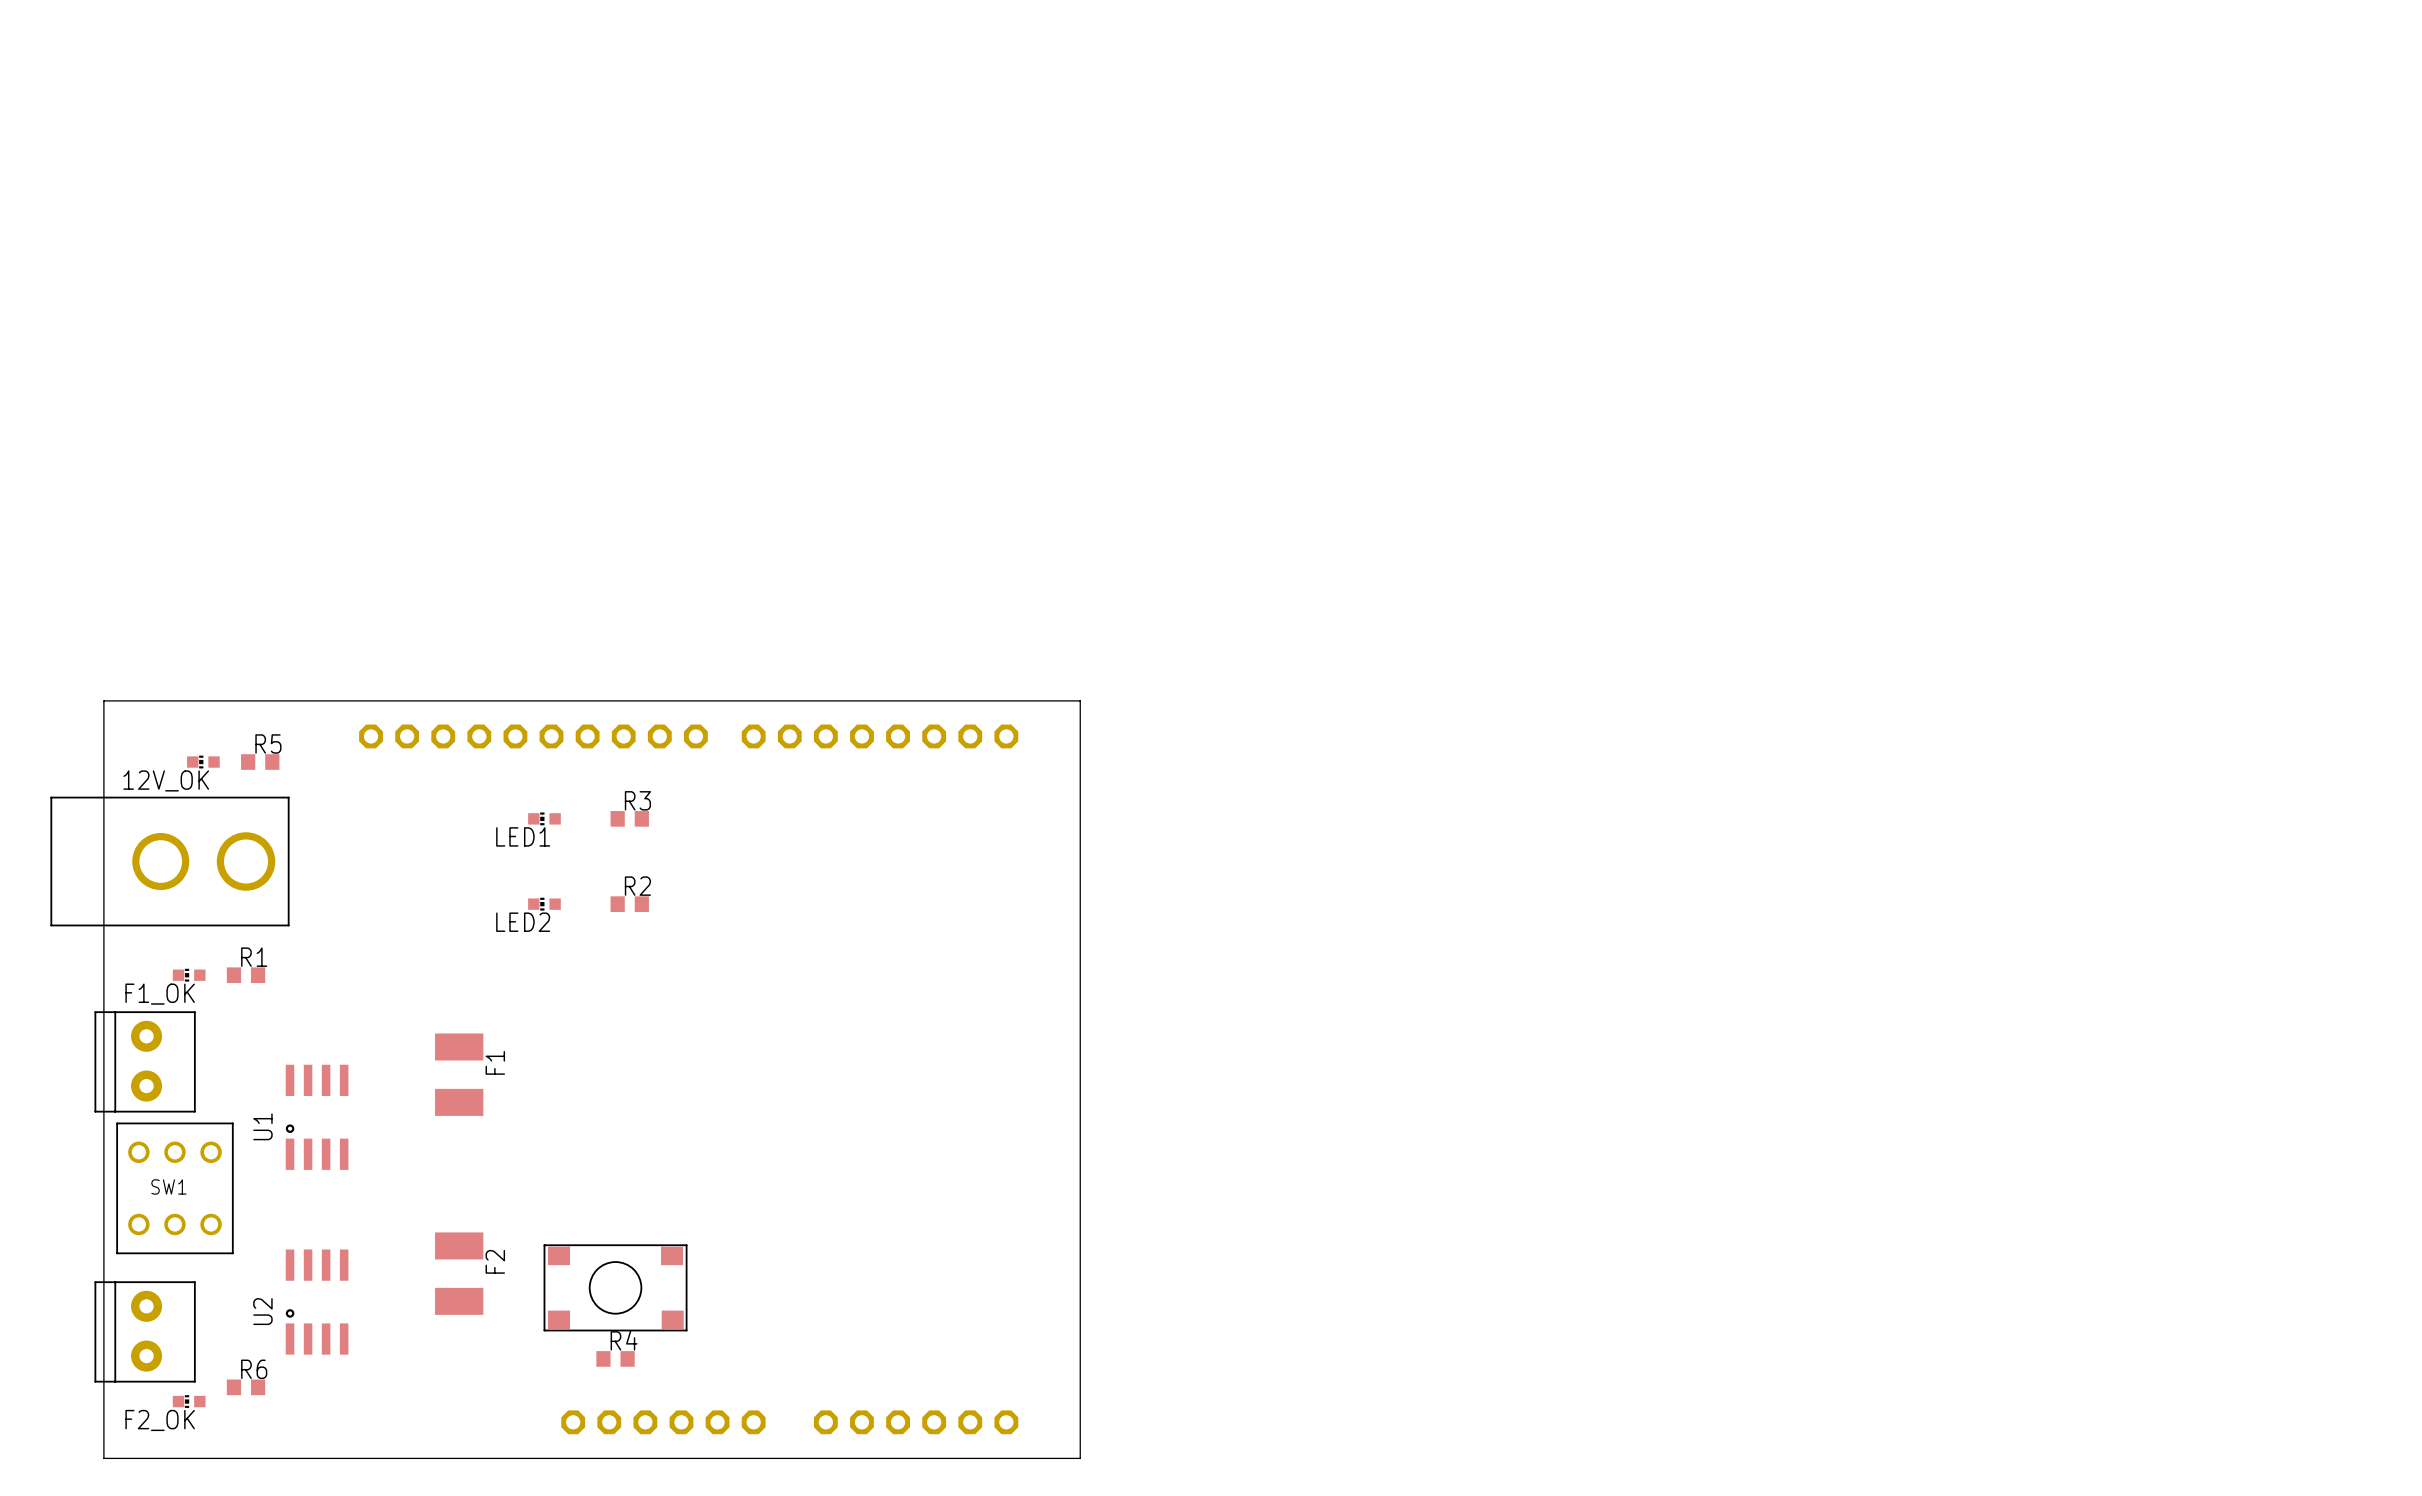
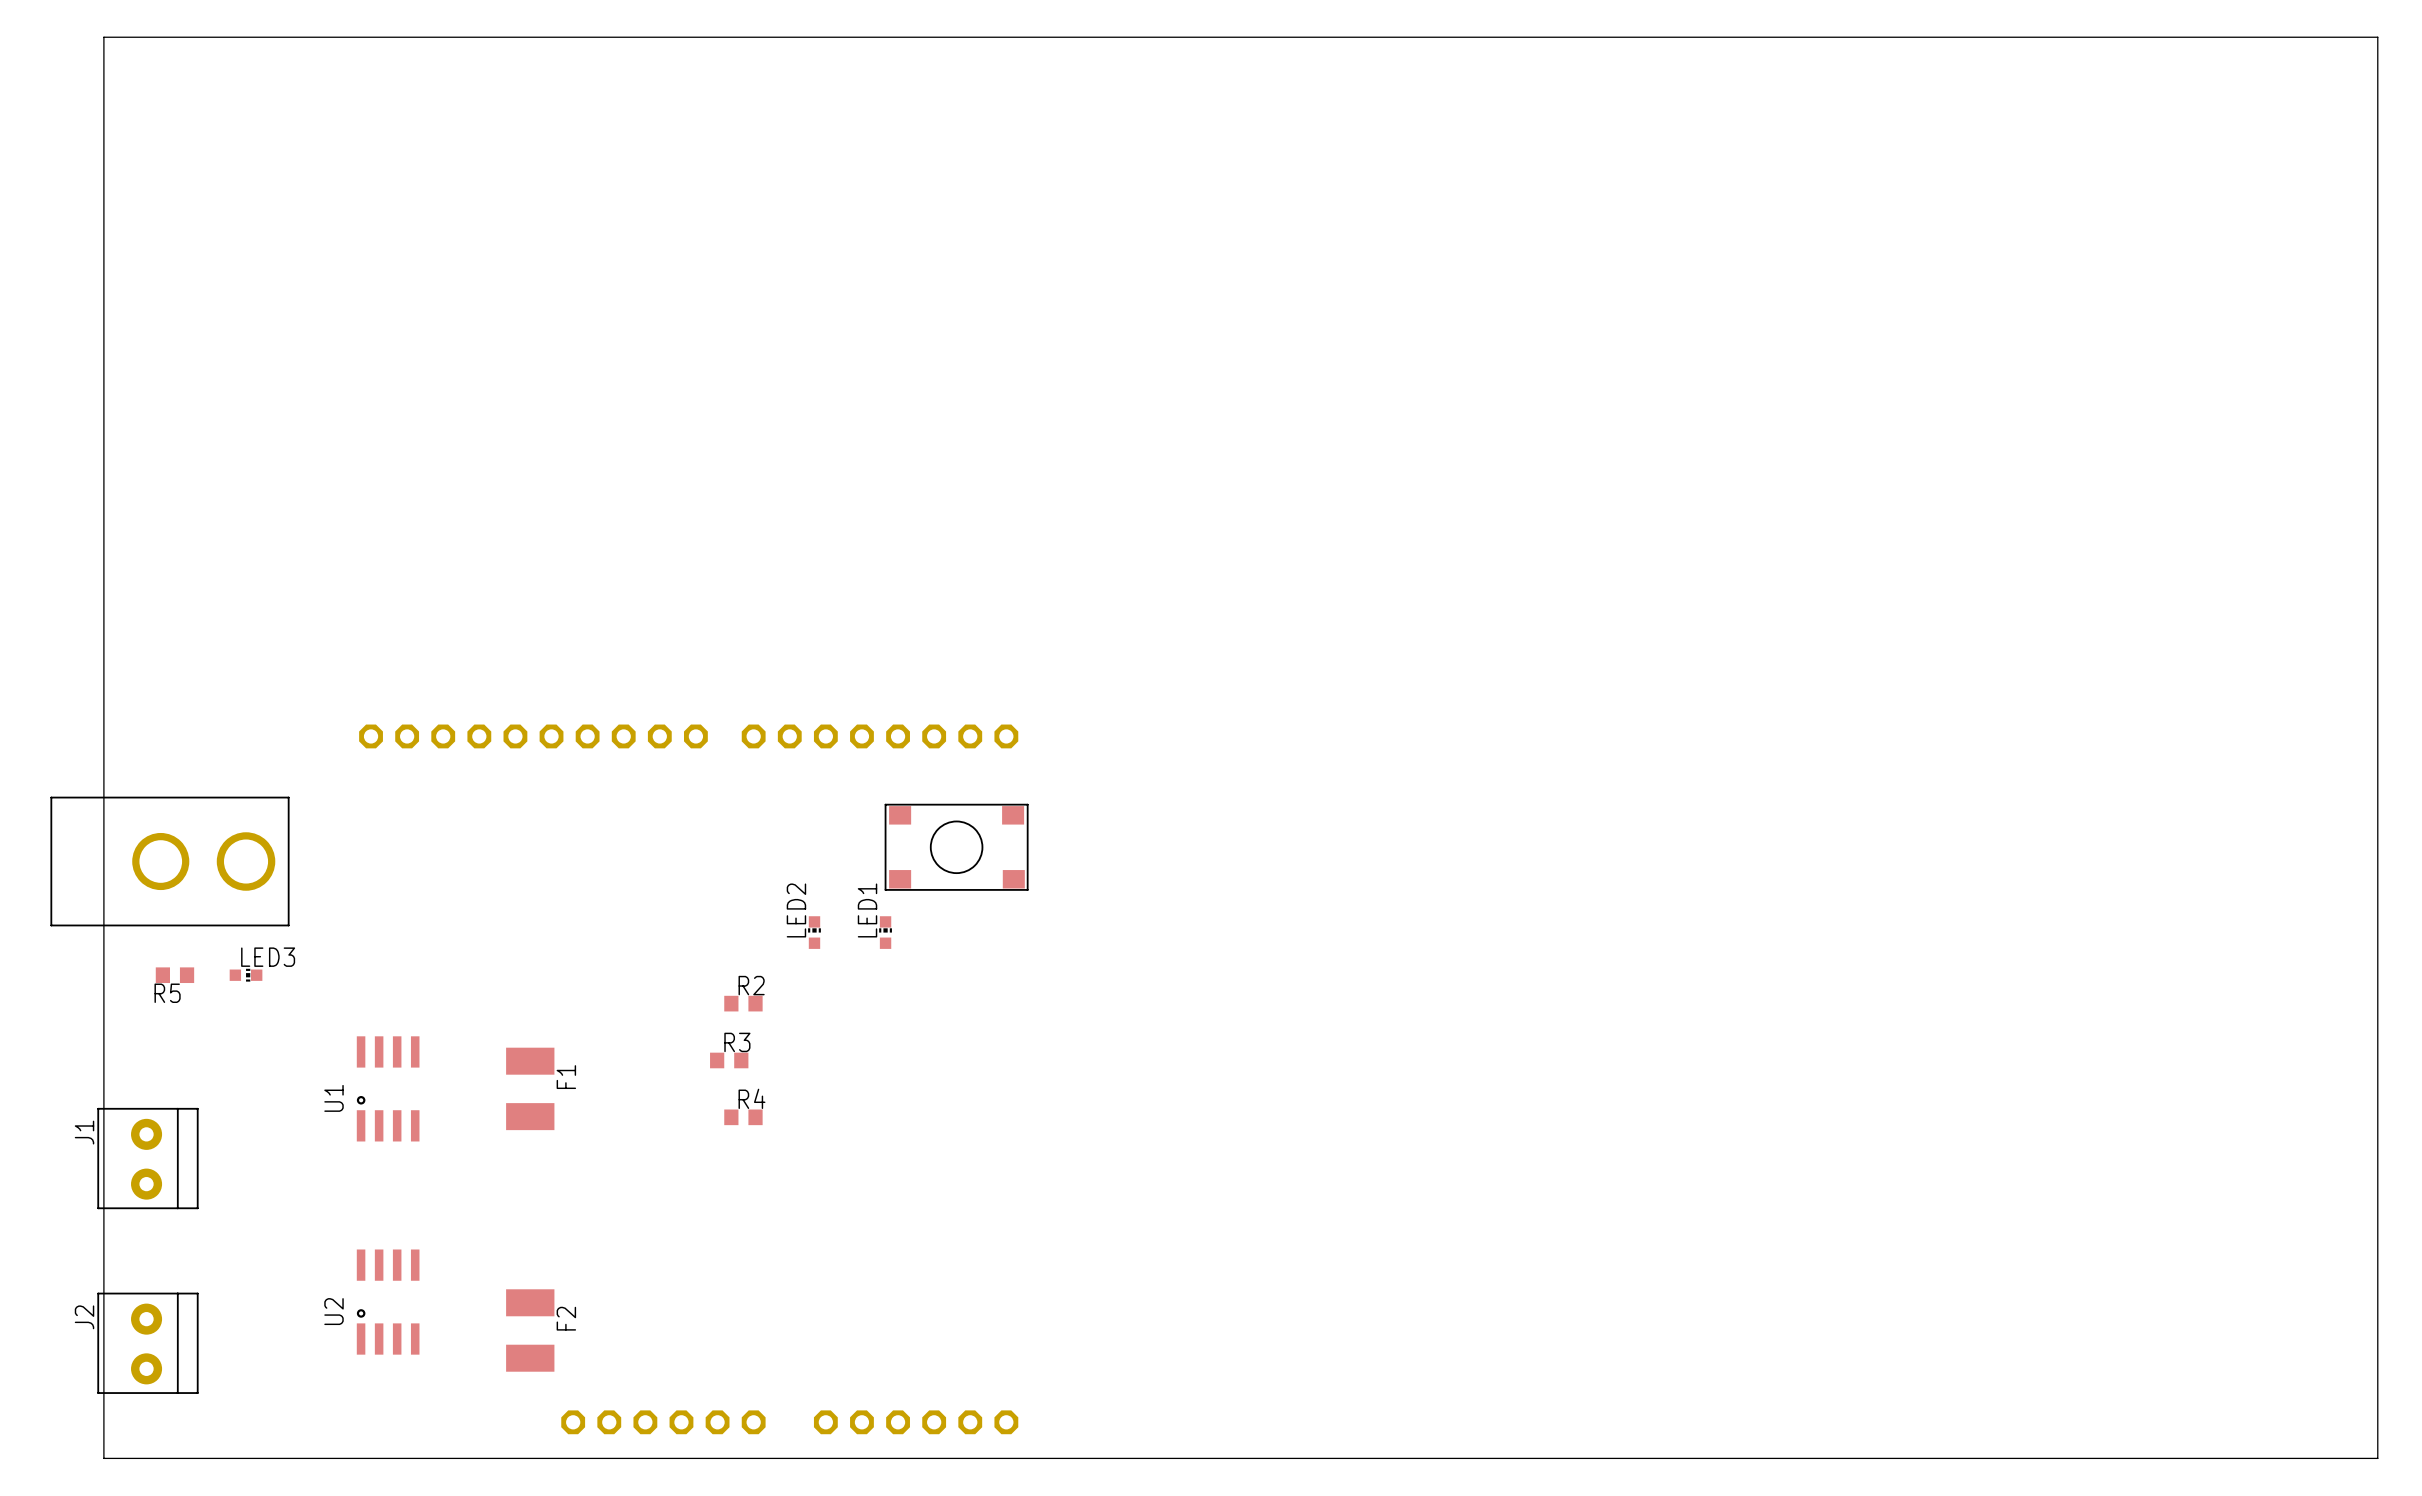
board edge: (103, 700) (1080, 700) (1080, 1458) -> (103, 700) (103, 37) (2377, 37) (2377, 1458) (1080, 1458)
R5 name position: R5 (268, 743) -> R5 (167, 993)
12V_OK: (203, 762) -> none
R5 position: (260, 762) -> (174, 975)
LED1 rotation: 0° (544, 818) -> 90° clockwise (885, 932)
LED1 position: (544, 818) -> (885, 932)
R3 position: (629, 818) -> (729, 1060)
part: none -> (956, 847)
LED2 rotation: 0° (544, 904) -> 90° clockwise (814, 932)
LED2 position: (544, 904) -> (814, 932)
R2 position: (629, 904) -> (743, 1003)
F1_OK: (189, 975) -> none
R1: (246, 975) -> none
LED3: none -> (246, 975)
part: (145, 1061) -> none
F1 position: (459, 1074) -> (530, 1088)
U1 position: (317, 1117) -> (388, 1088)
J1: none -> (147, 1158)
SW1: (174, 1188) -> none
F2 position: (459, 1273) -> (530, 1330)
part: (615, 1287) -> none
U2 position: (317, 1302) -> (388, 1302)
part: (145, 1331) -> none
J2: none -> (147, 1343)
R4 position: (615, 1358) -> (743, 1117)
R6: (246, 1387) -> none
F2_OK: (189, 1401) -> none

